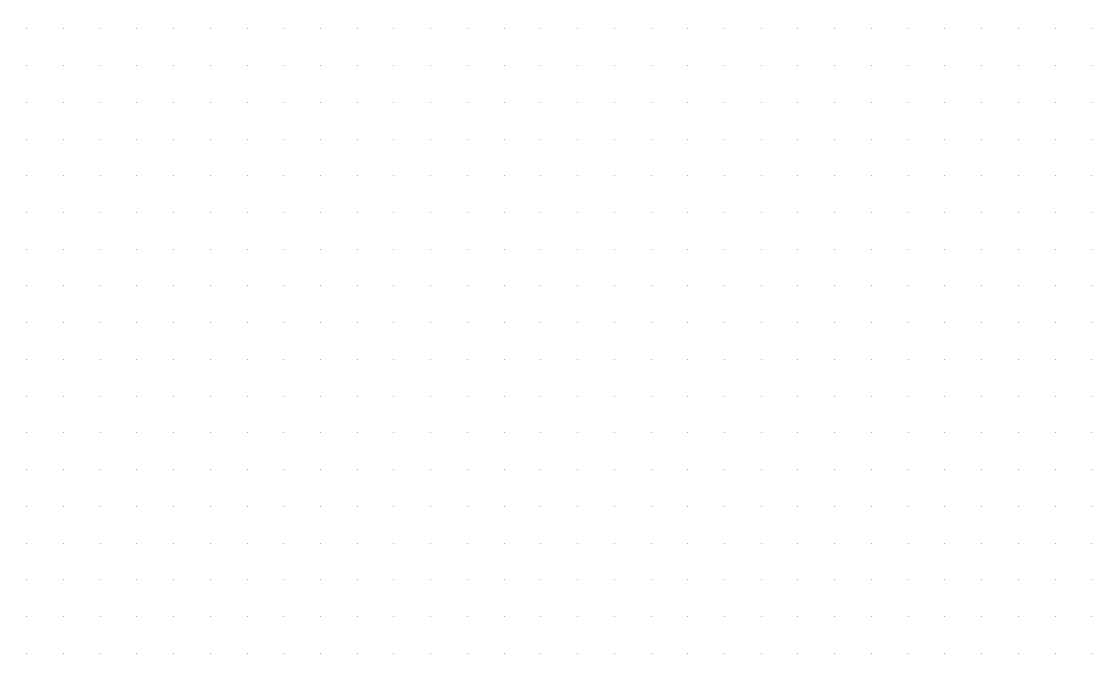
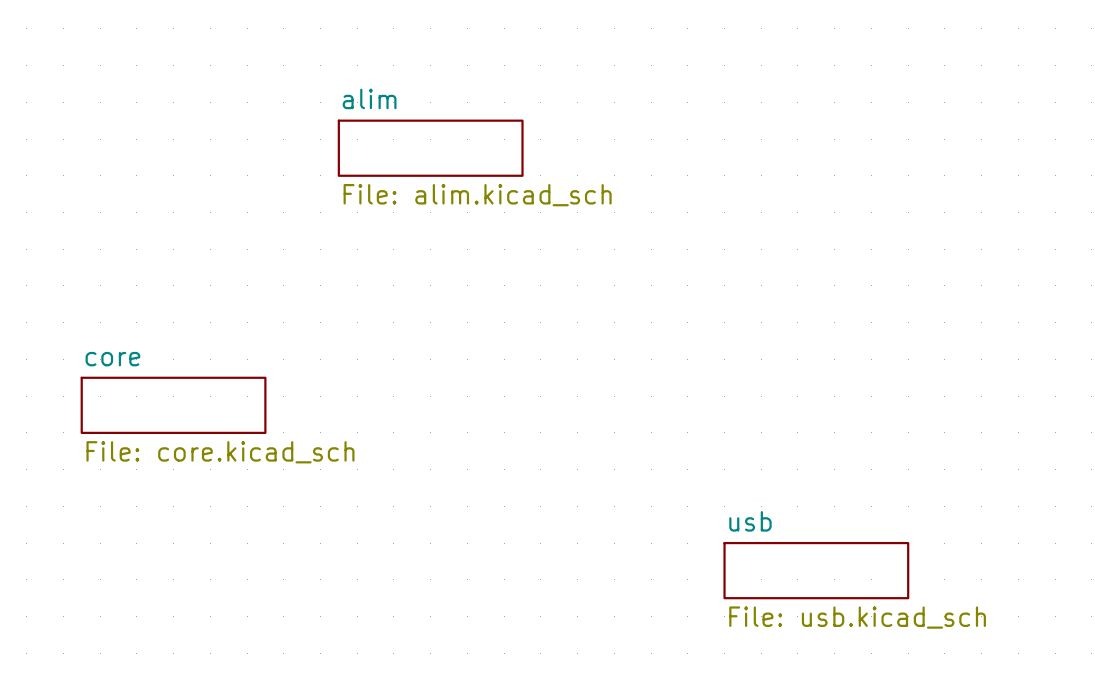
sheet alim: none -> File: alim.kicad_sch (430, 148)
sheet core: none -> File: core.kicad_sch (173, 405)
sheet usb: none -> File: usb.kicad_sch (816, 570)

